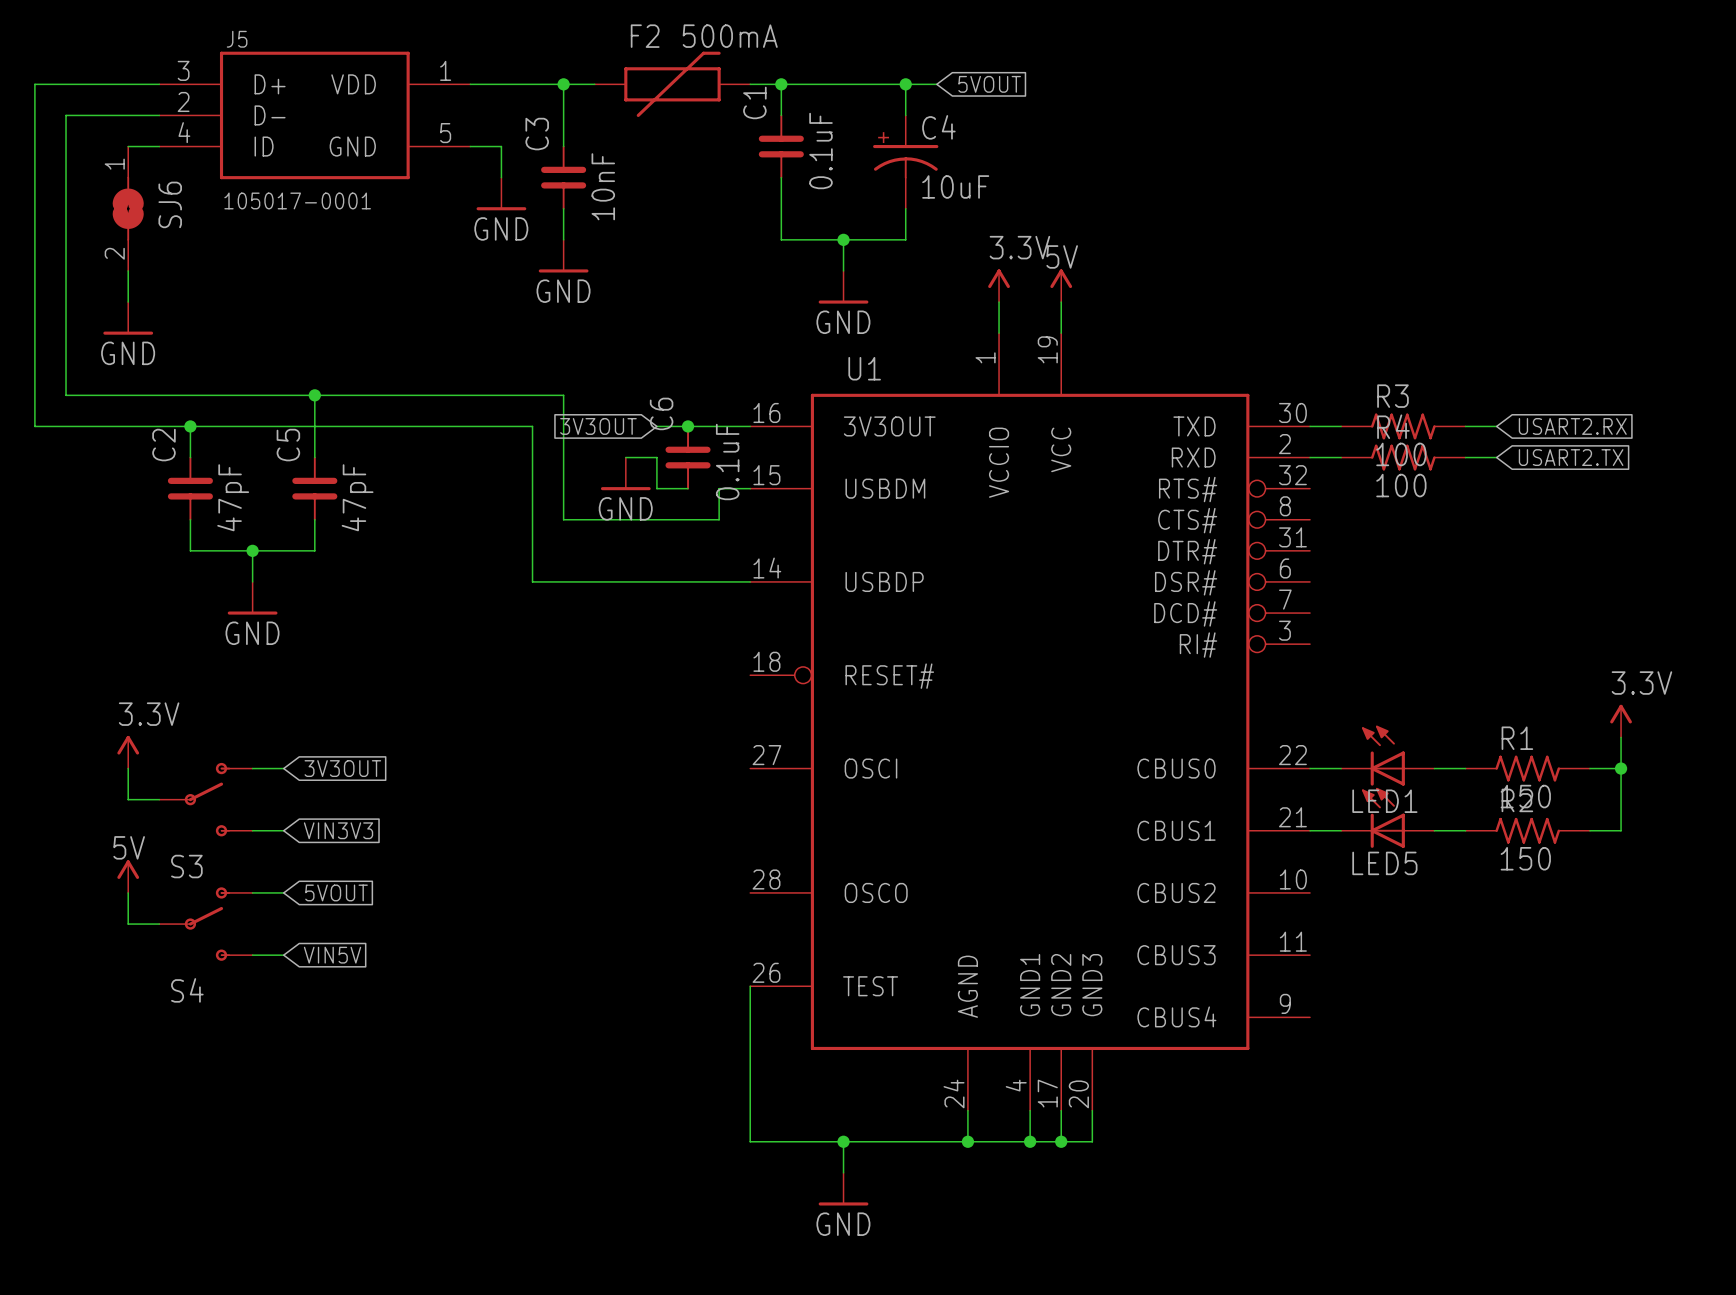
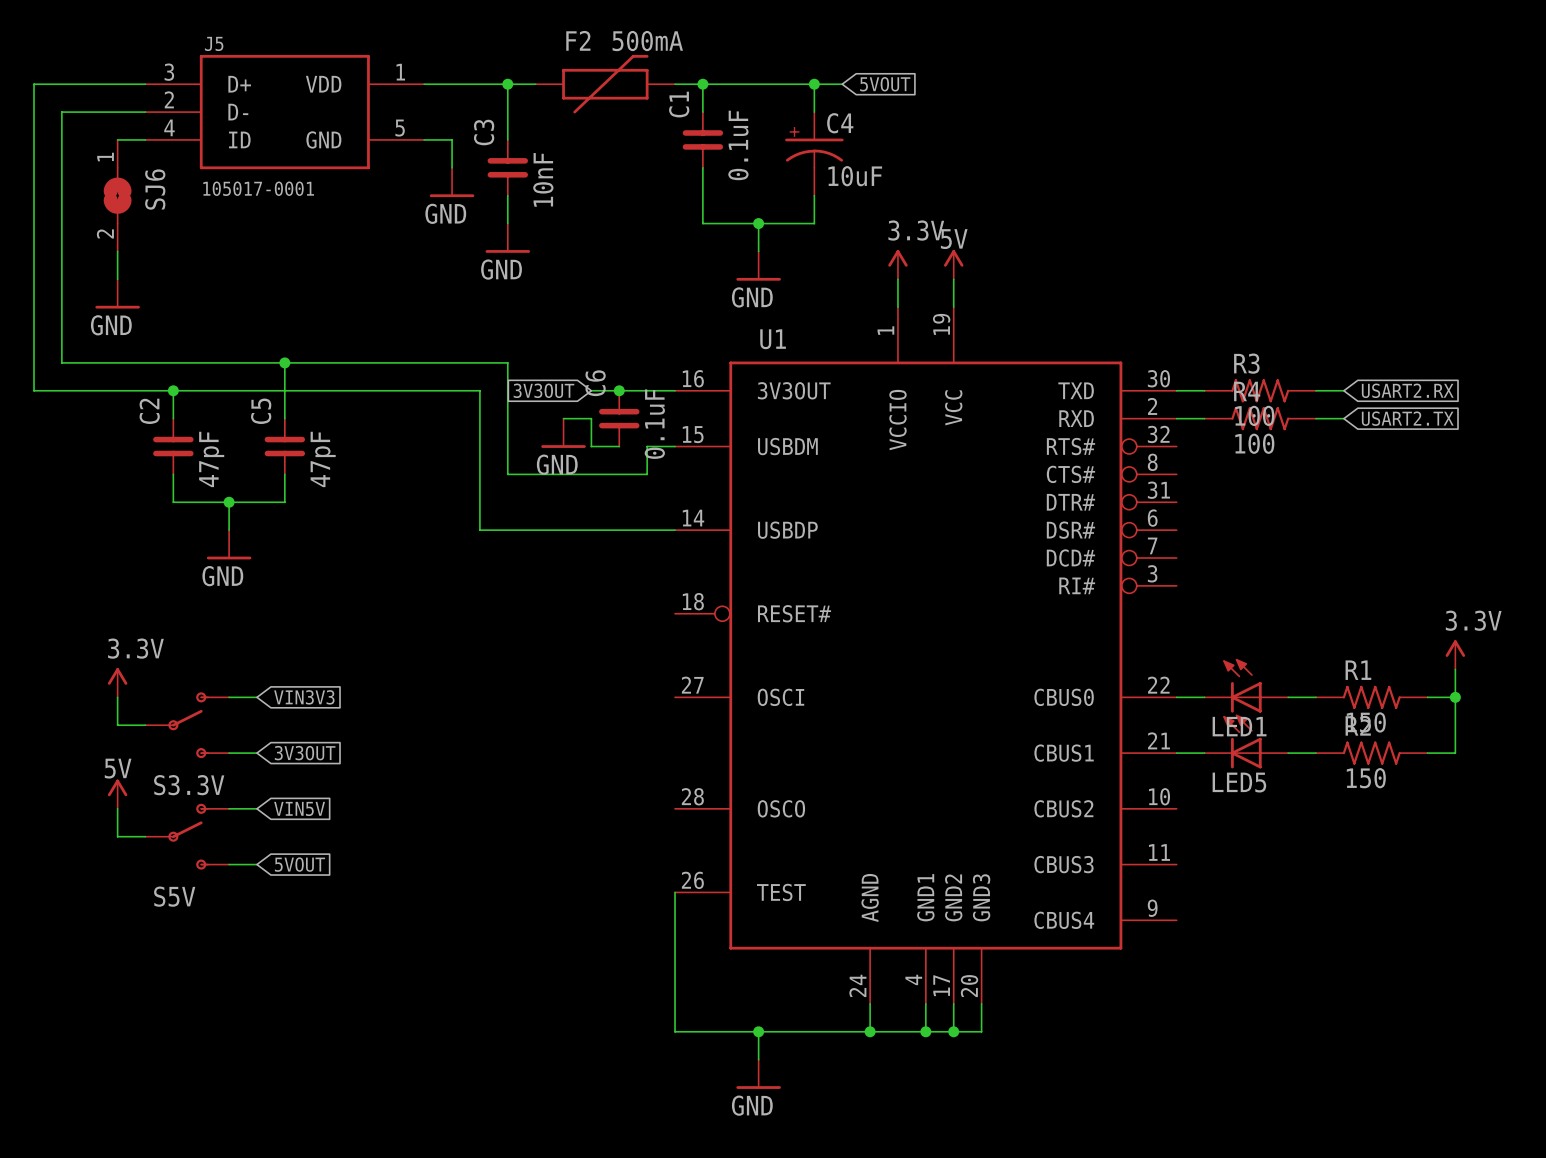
global label: 3V3OUT (342, 768) -> VIN3V3 (304, 697)
global label: VIN3V3 (338, 830) -> 3V3OUT (305, 753)
S3 name: S3 (186, 866) -> S3.3V (189, 785)
global label: 5VOUT (336, 892) -> VIN5V (299, 808)
global label: VIN5V (332, 955) -> 5VOUT (299, 864)
S4 name: S4 (187, 990) -> S5V (174, 896)

